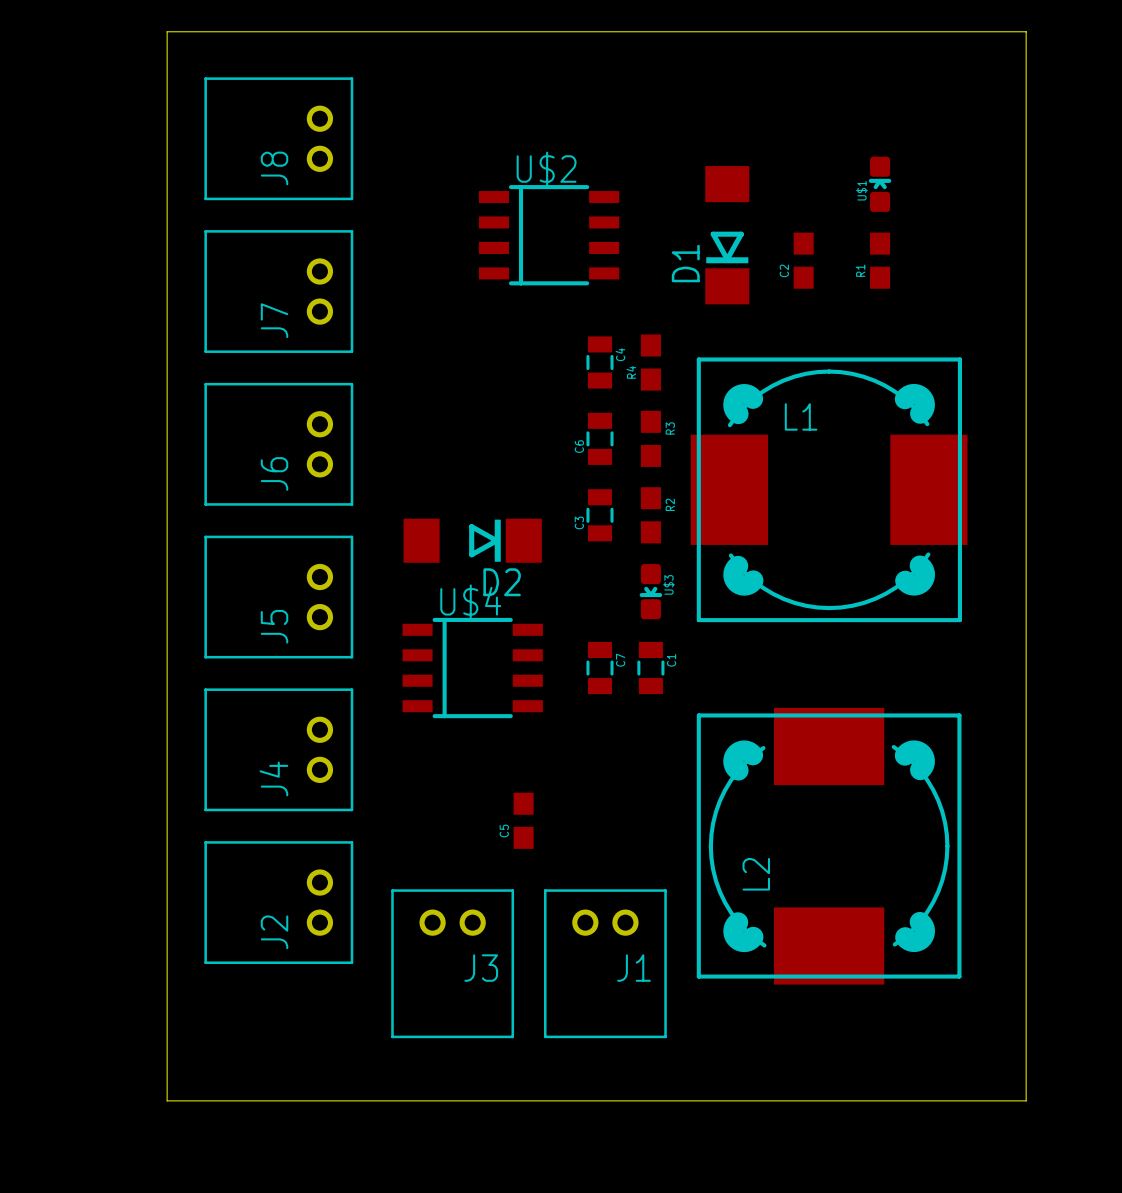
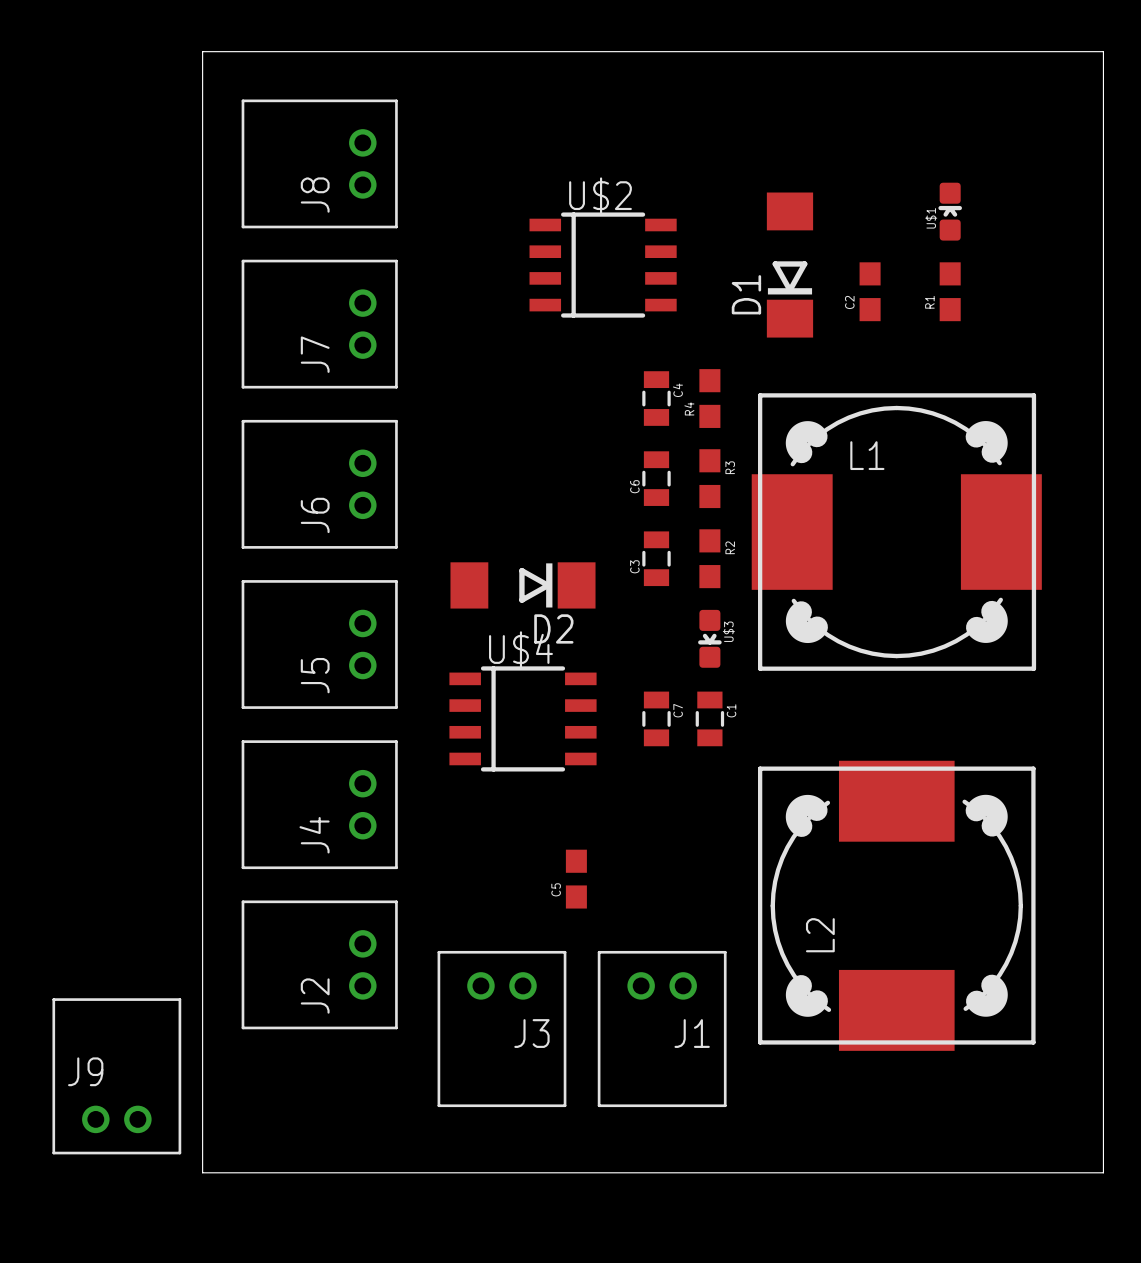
J9: none -> (116, 1076)

